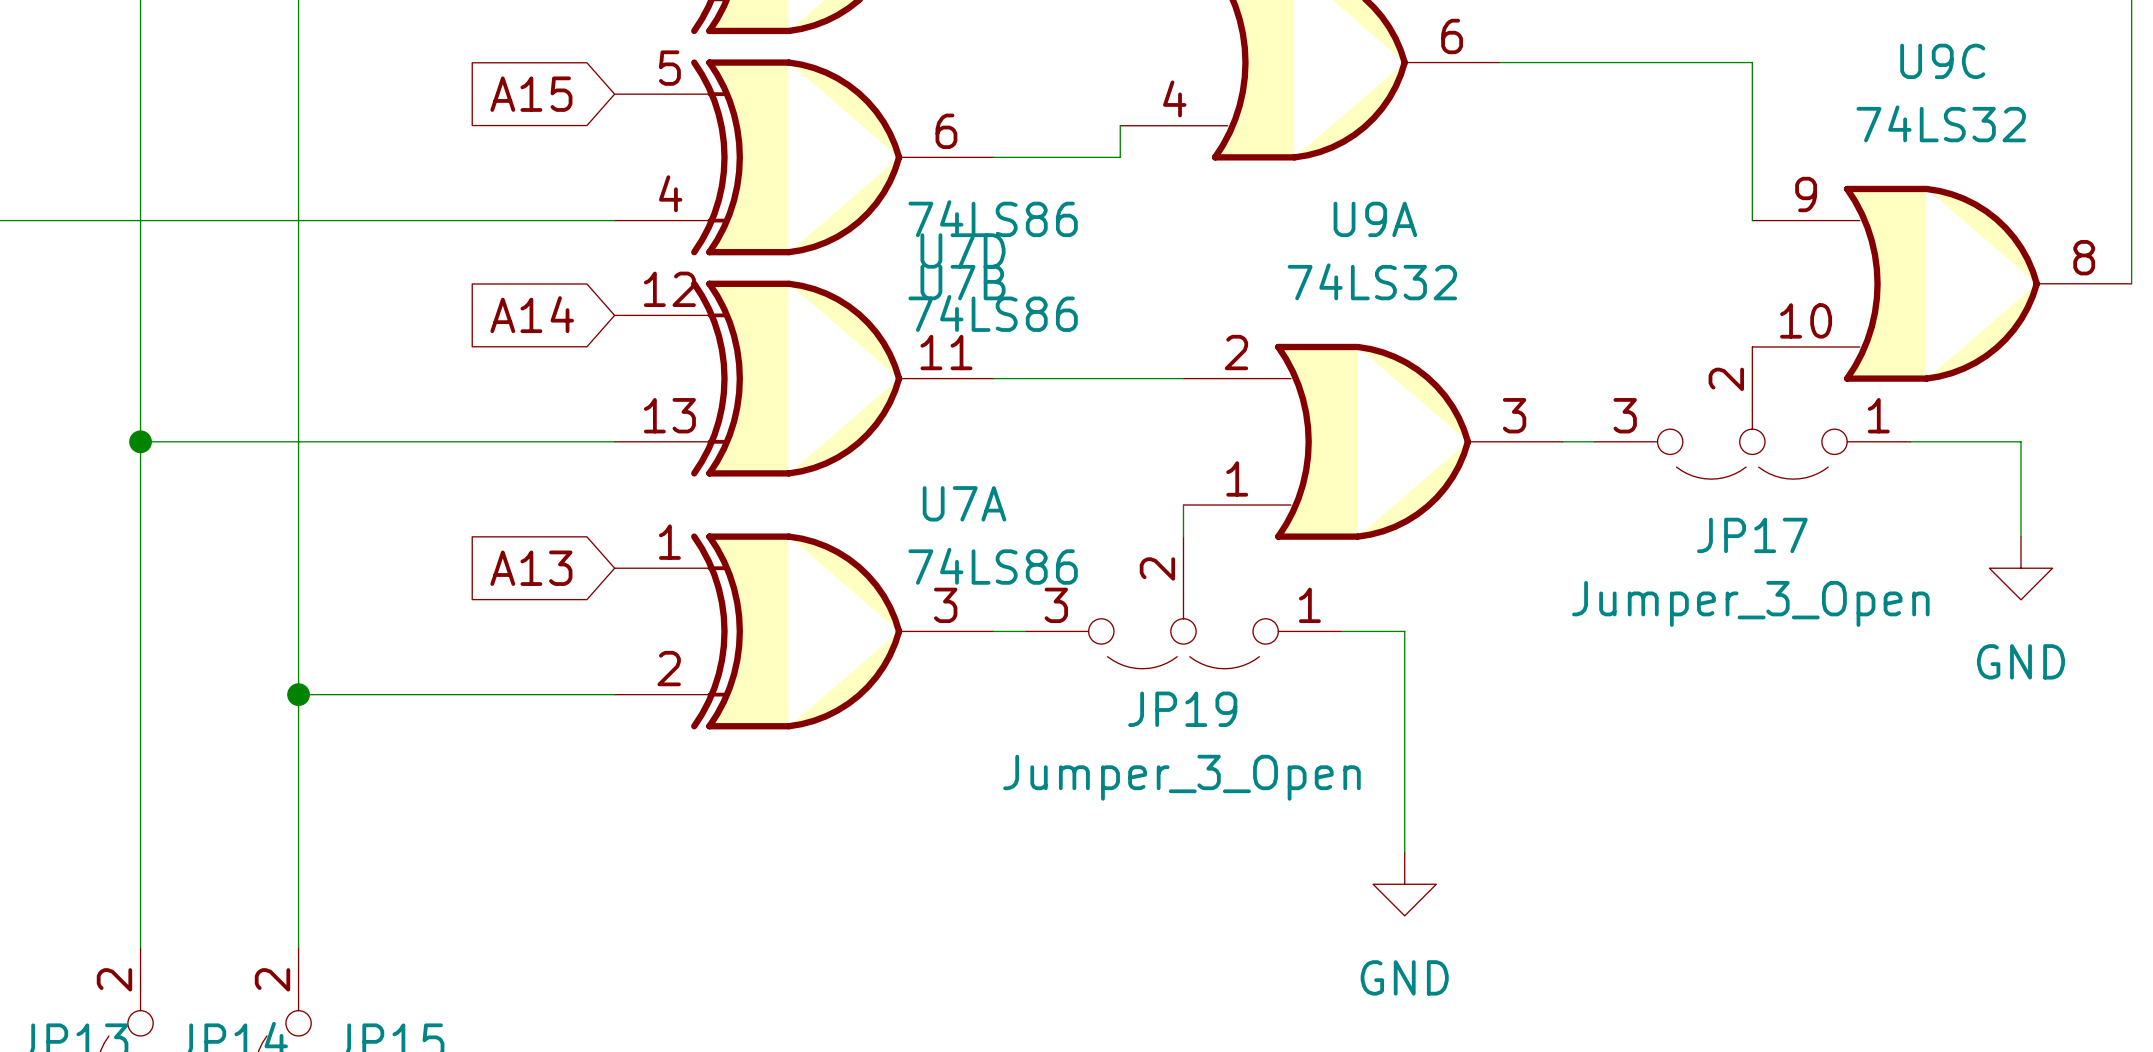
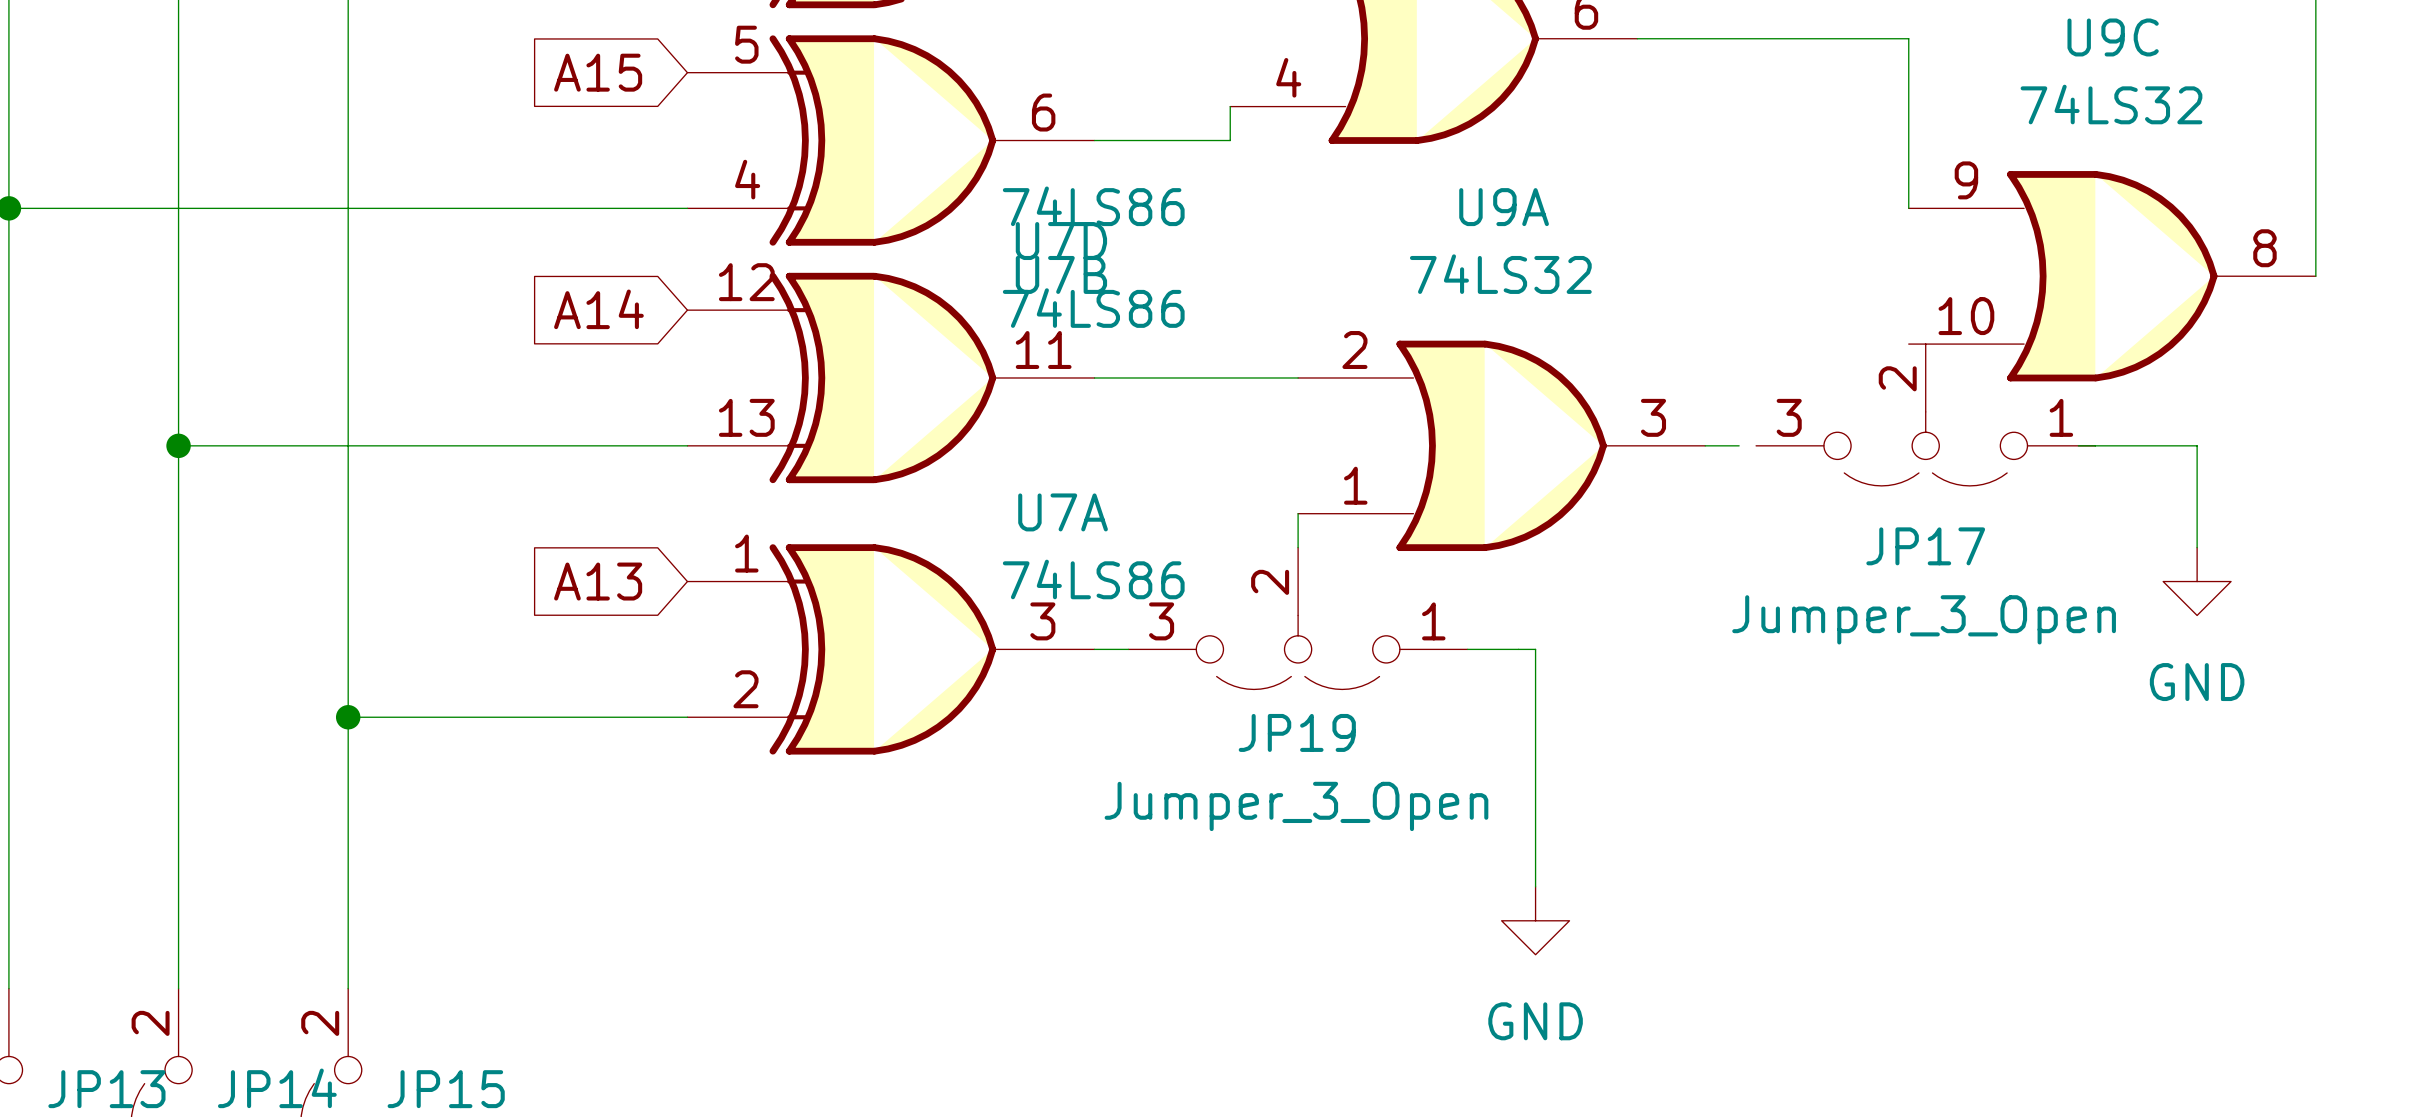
JP17 position: (1752, 413) -> (1925, 414)

